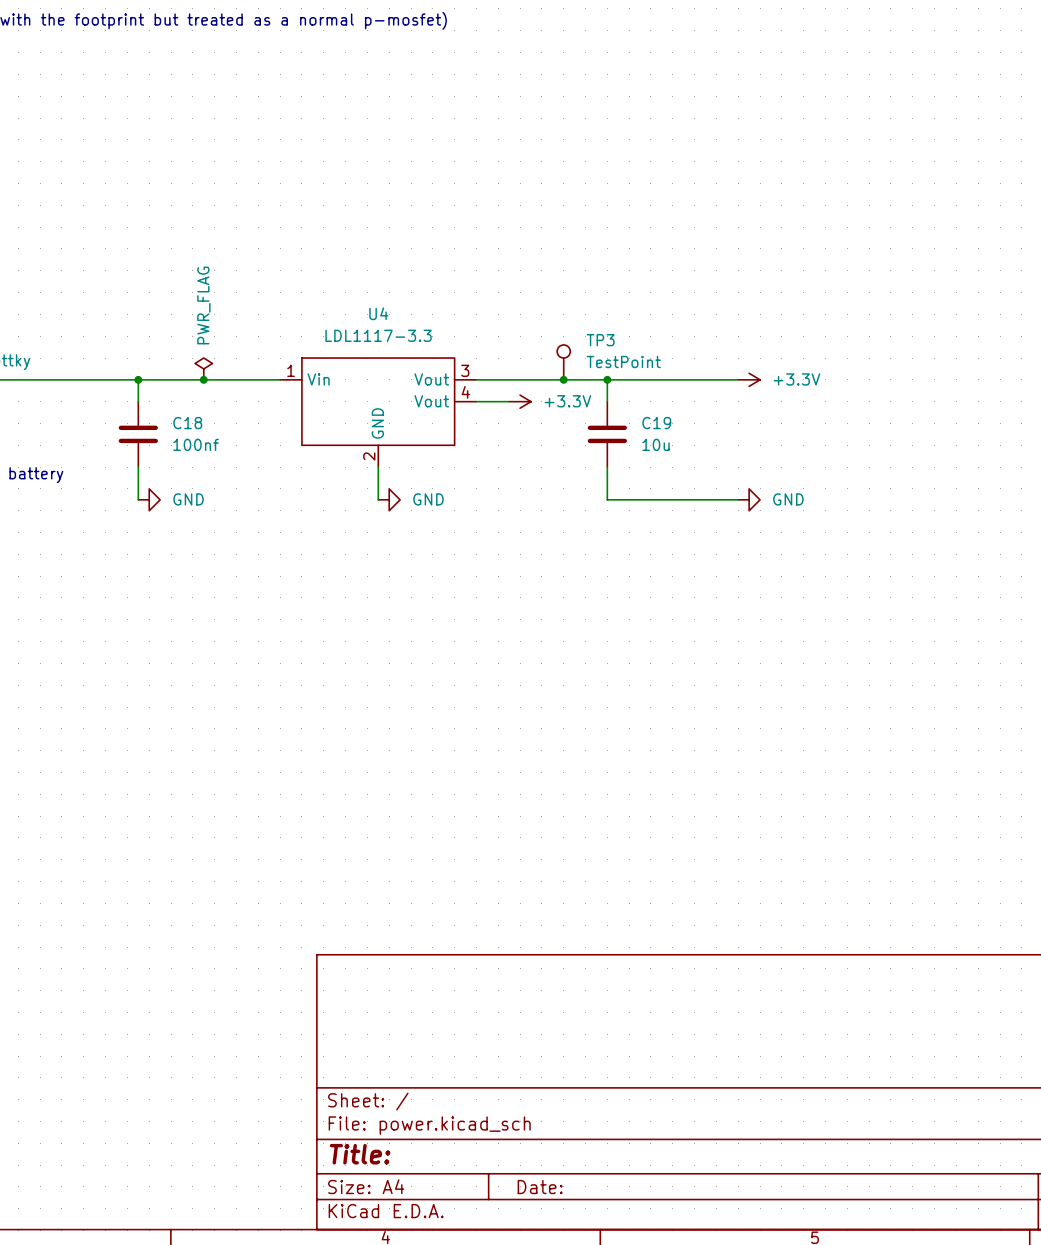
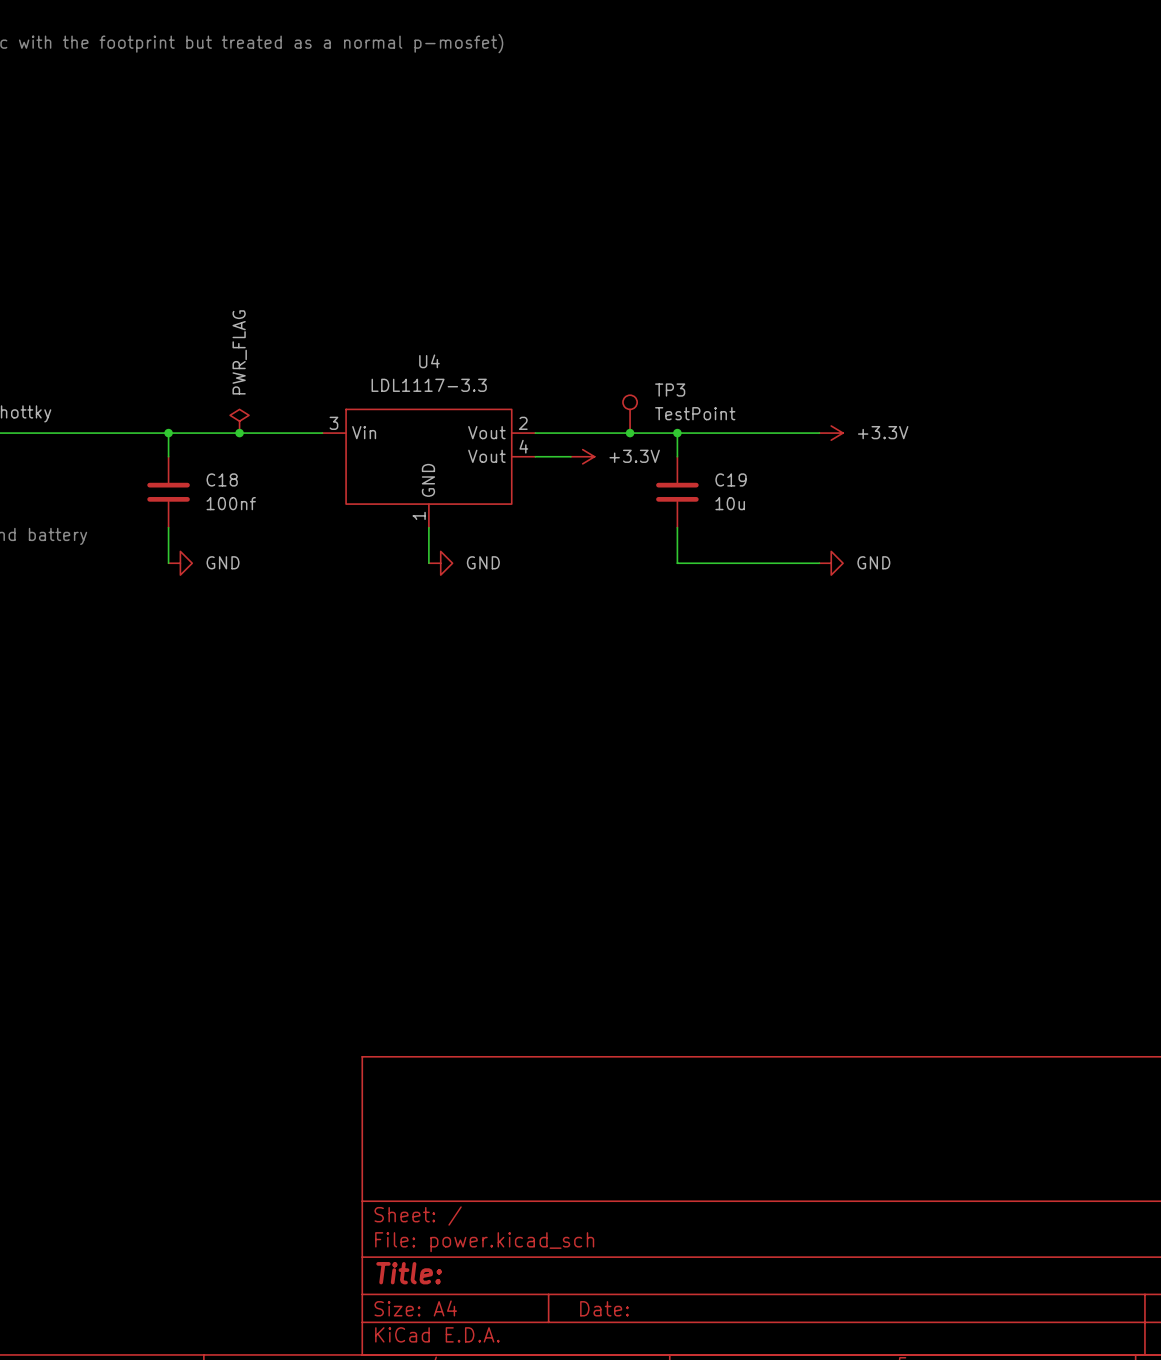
U4 pin number: 1 (291, 370) -> 3 (333, 423)
U4 pin number: 3 (465, 370) -> 2 (523, 423)
U4 pin number: 2 (369, 456) -> 1 (419, 515)

